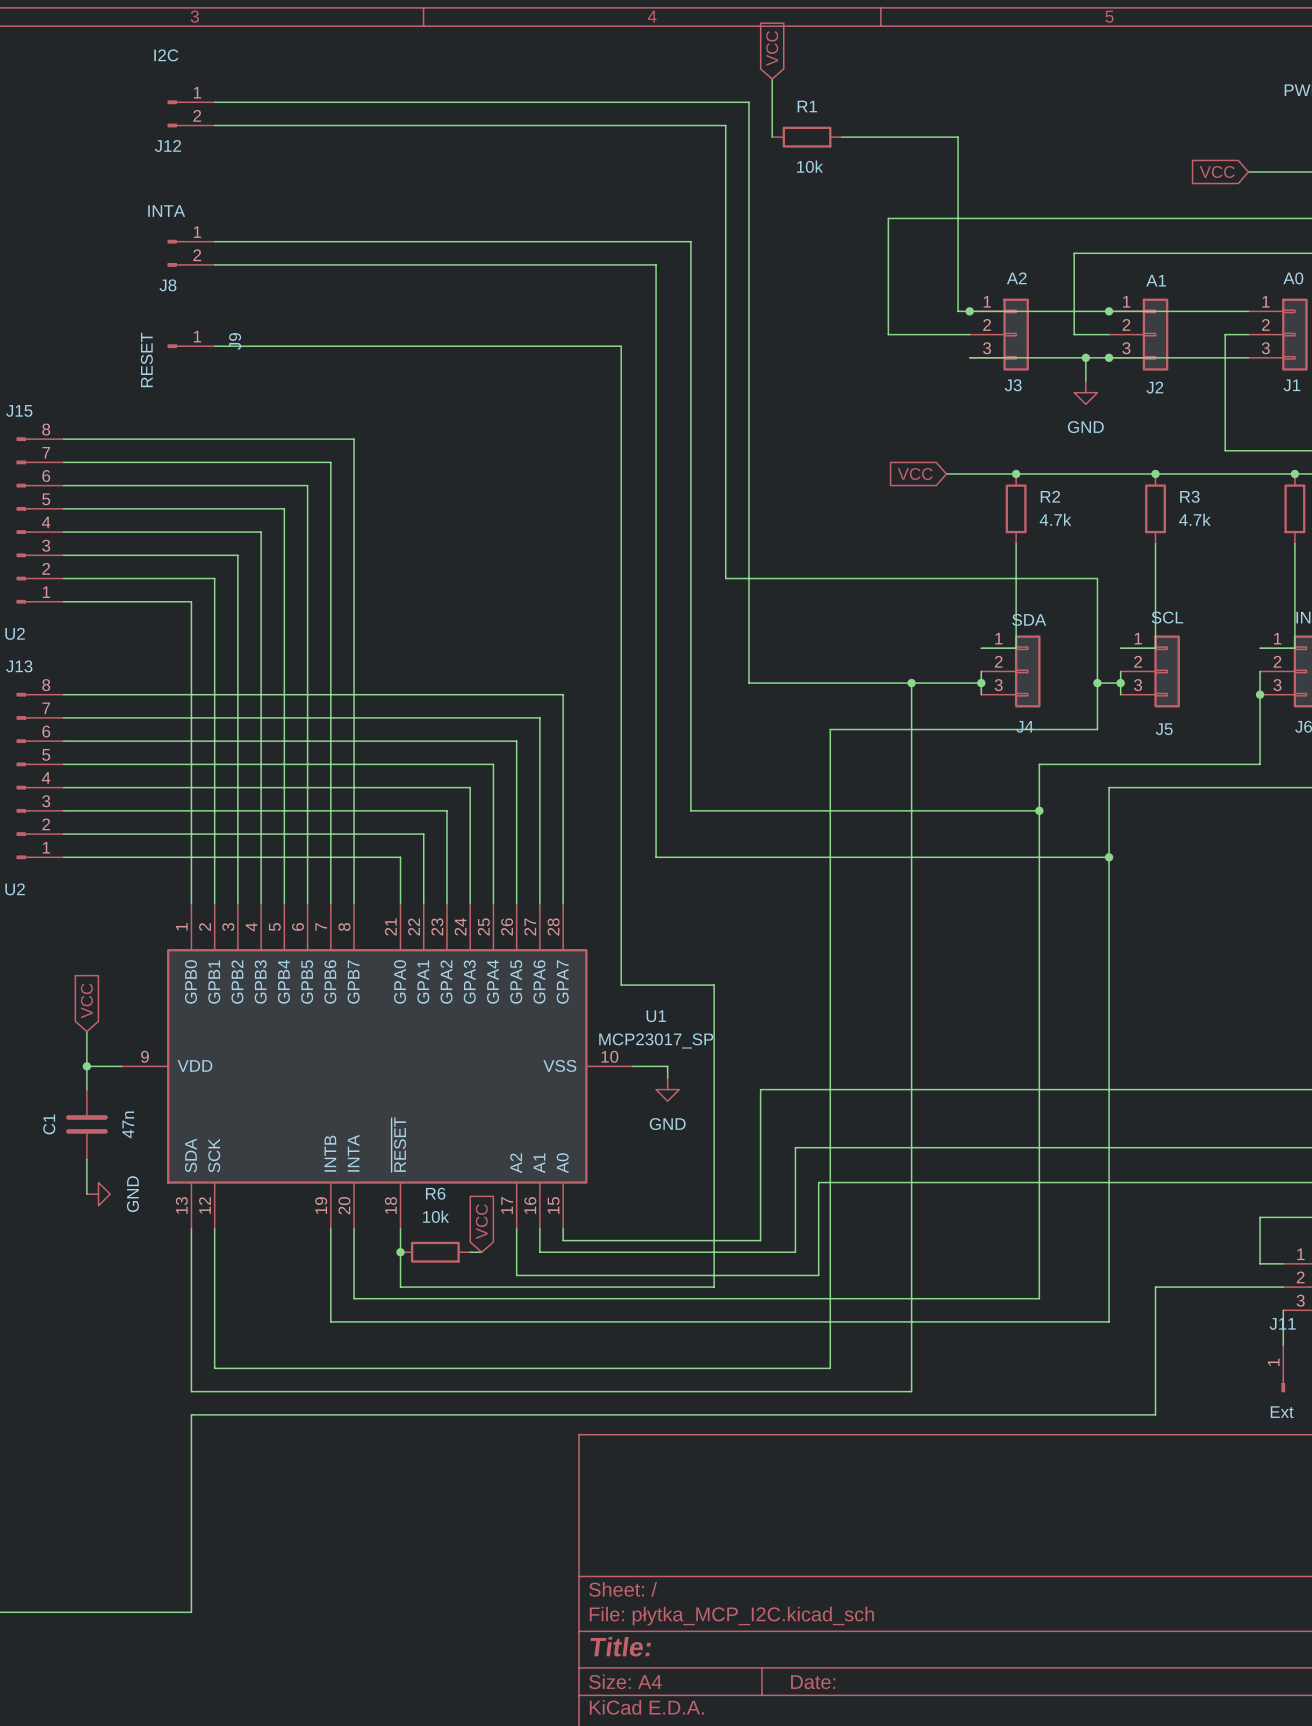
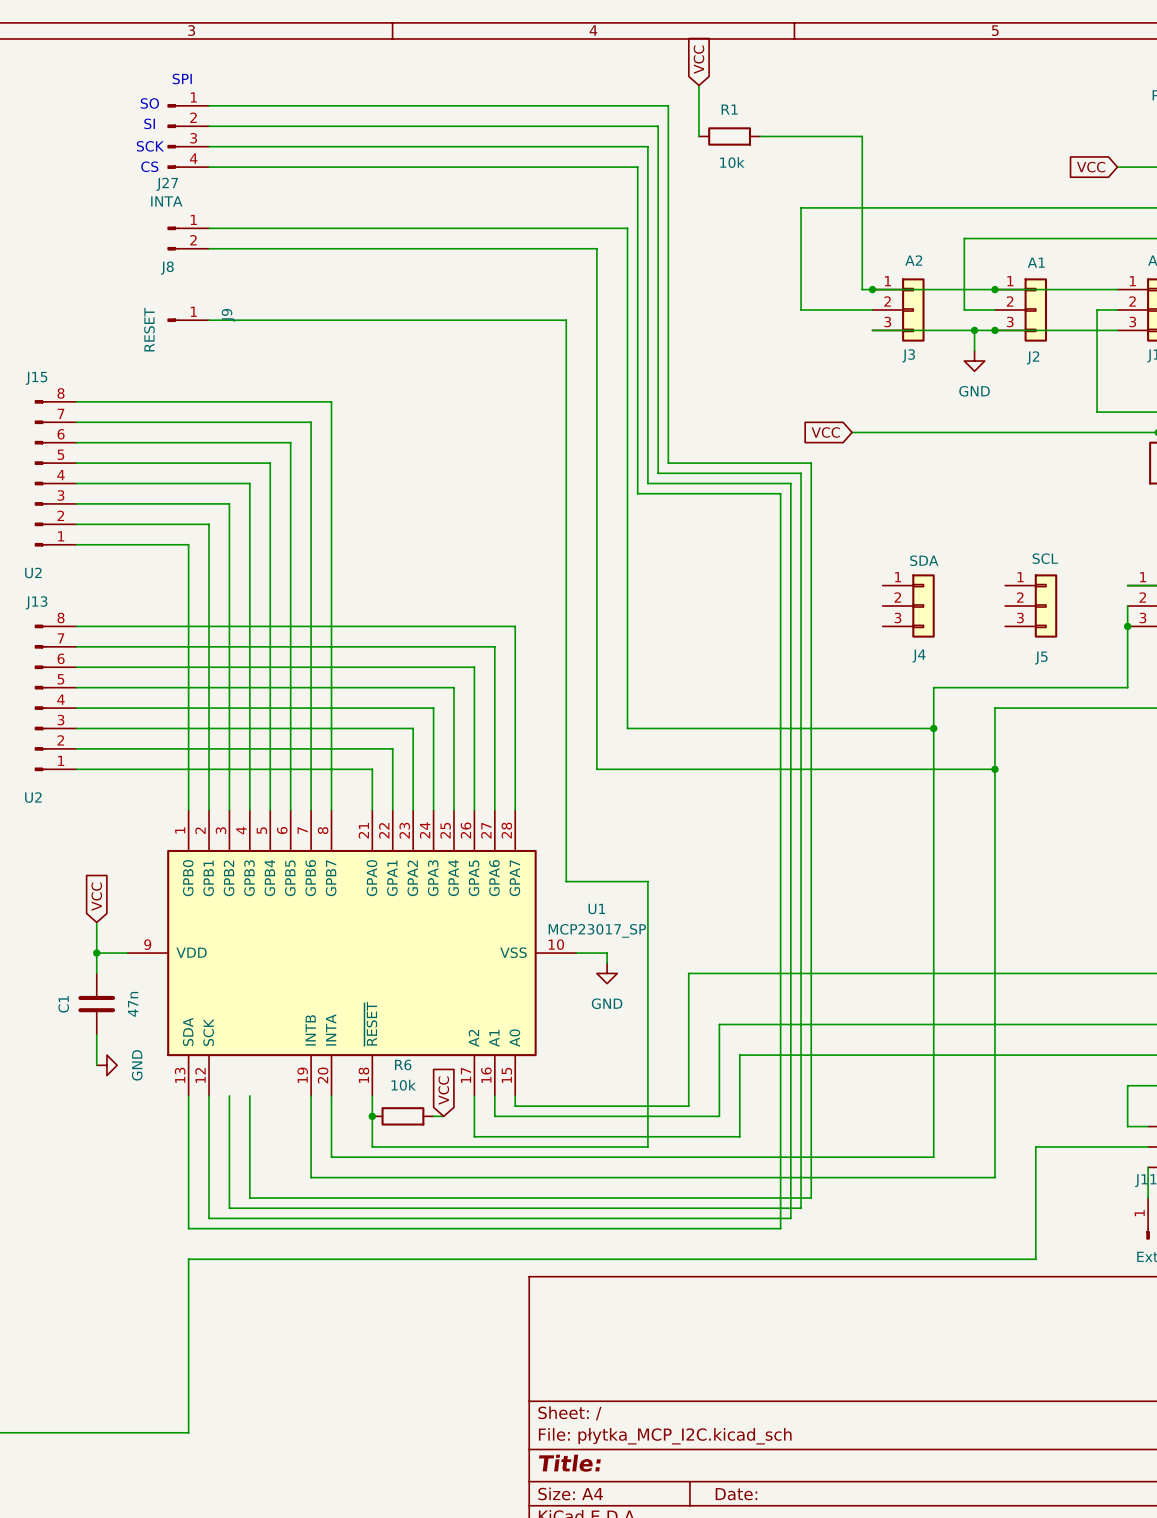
text: none -> SPI (182, 78)
text: none -> SO (149, 103)
wire: (737, 102) (748, 102) (748, 683) (981, 683) -> (668, 105) (668, 463) (811, 463) (811, 1198) (249, 1198) (249, 1095)
J12: I2C (191, 113) -> none
text: none -> SI (149, 123)
J27: none -> (188, 136)
text: none -> SCK (150, 146)
wire: none -> (209, 146) (647, 146) (647, 483) (790, 483) (790, 1218) (750, 1218)
text: none -> CS (149, 166)
junction: (1016, 473) -> none
junction: (1155, 473) -> none
R2: 4.7k (1016, 508) -> none
R3: 4.7k (1155, 508) -> none
wire: (725, 520) (725, 578) (1097, 578) (1097, 729) (830, 729) (830, 1368) -> (658, 473) (801, 473) (801, 1208) (229, 1208) (229, 1095)
wire: (1016, 543) (1016, 648) (981, 648) -> none
wire: (1155, 543) (1155, 648) (1120, 648) -> none
wire: (981, 671) (981, 694) -> none
wire: (1120, 671) (1120, 694) -> none
wire: (911, 683) (911, 1391) (191, 1391) (191, 1380) -> (209, 167) (637, 167) (637, 493) (780, 493) (780, 1228) (188, 1228)
junction: (911, 683) -> none
junction: (981, 683) -> none
wire: (1097, 683) (1120, 683) -> none
junction: (1097, 683) -> none
junction: (1120, 683) -> none

